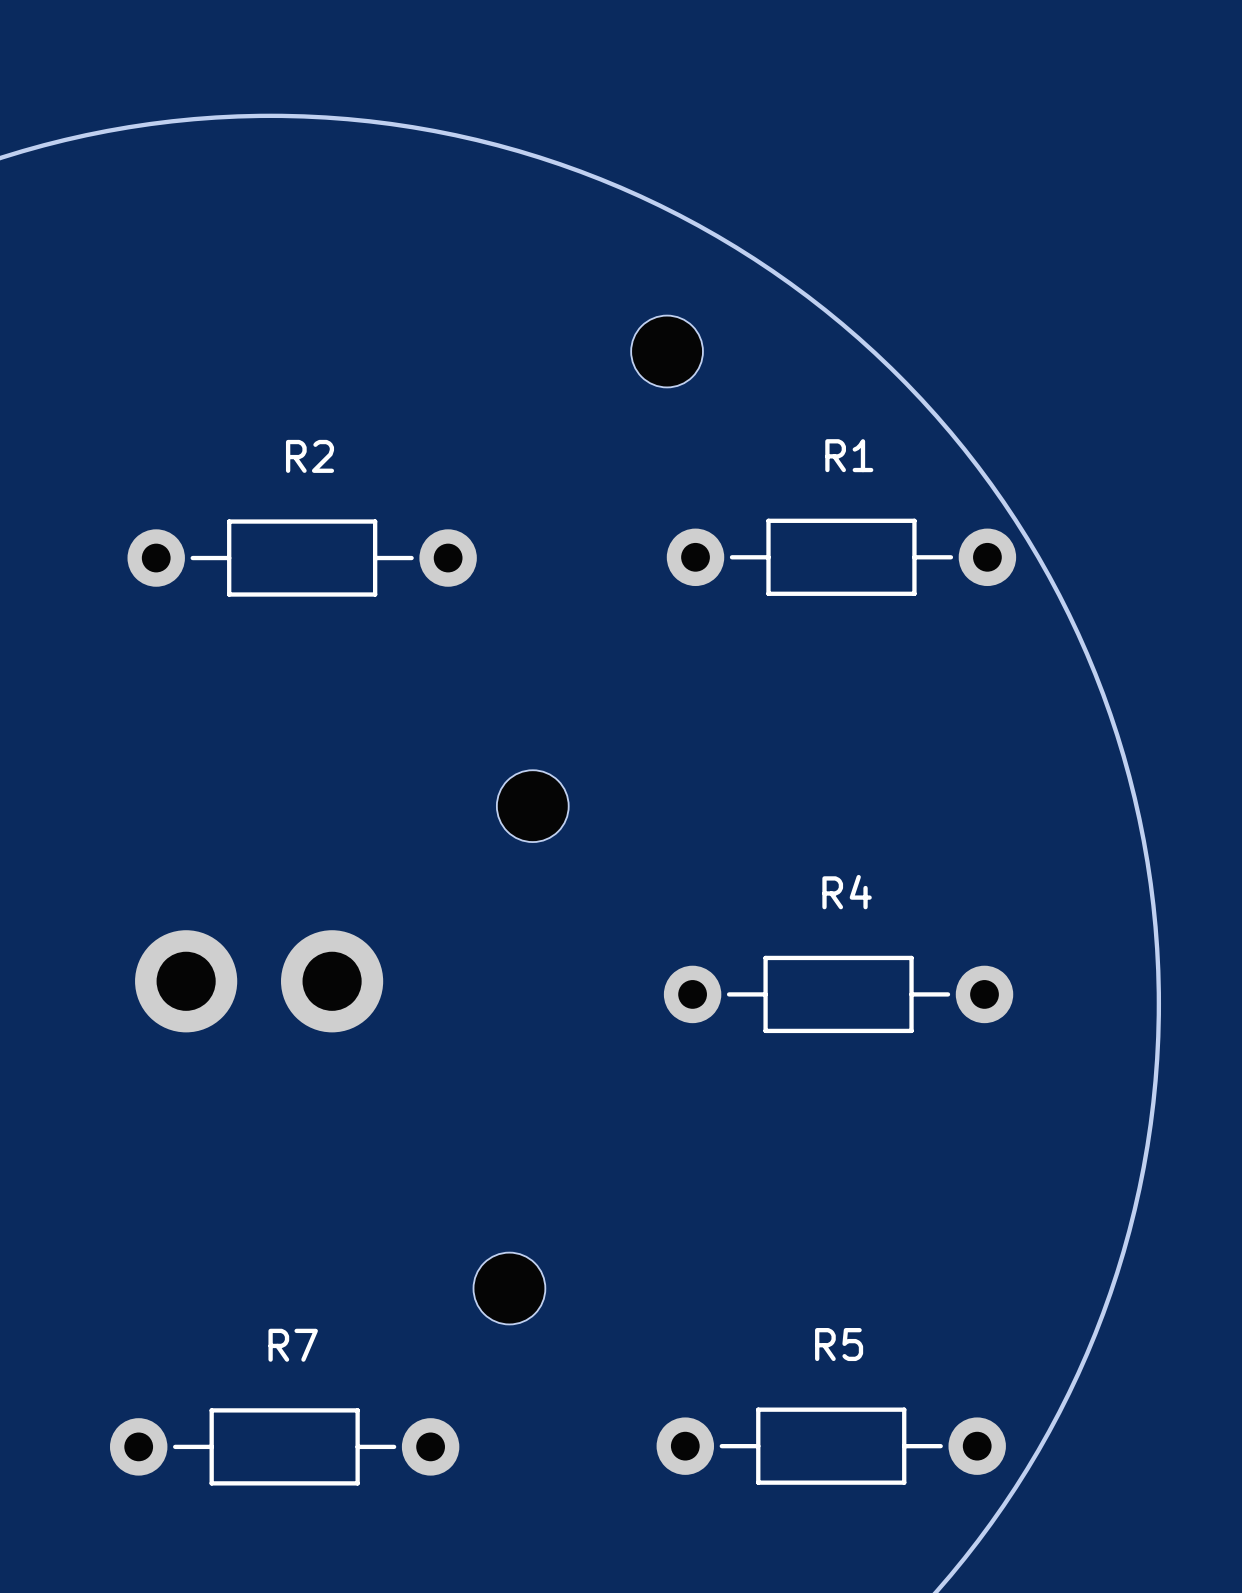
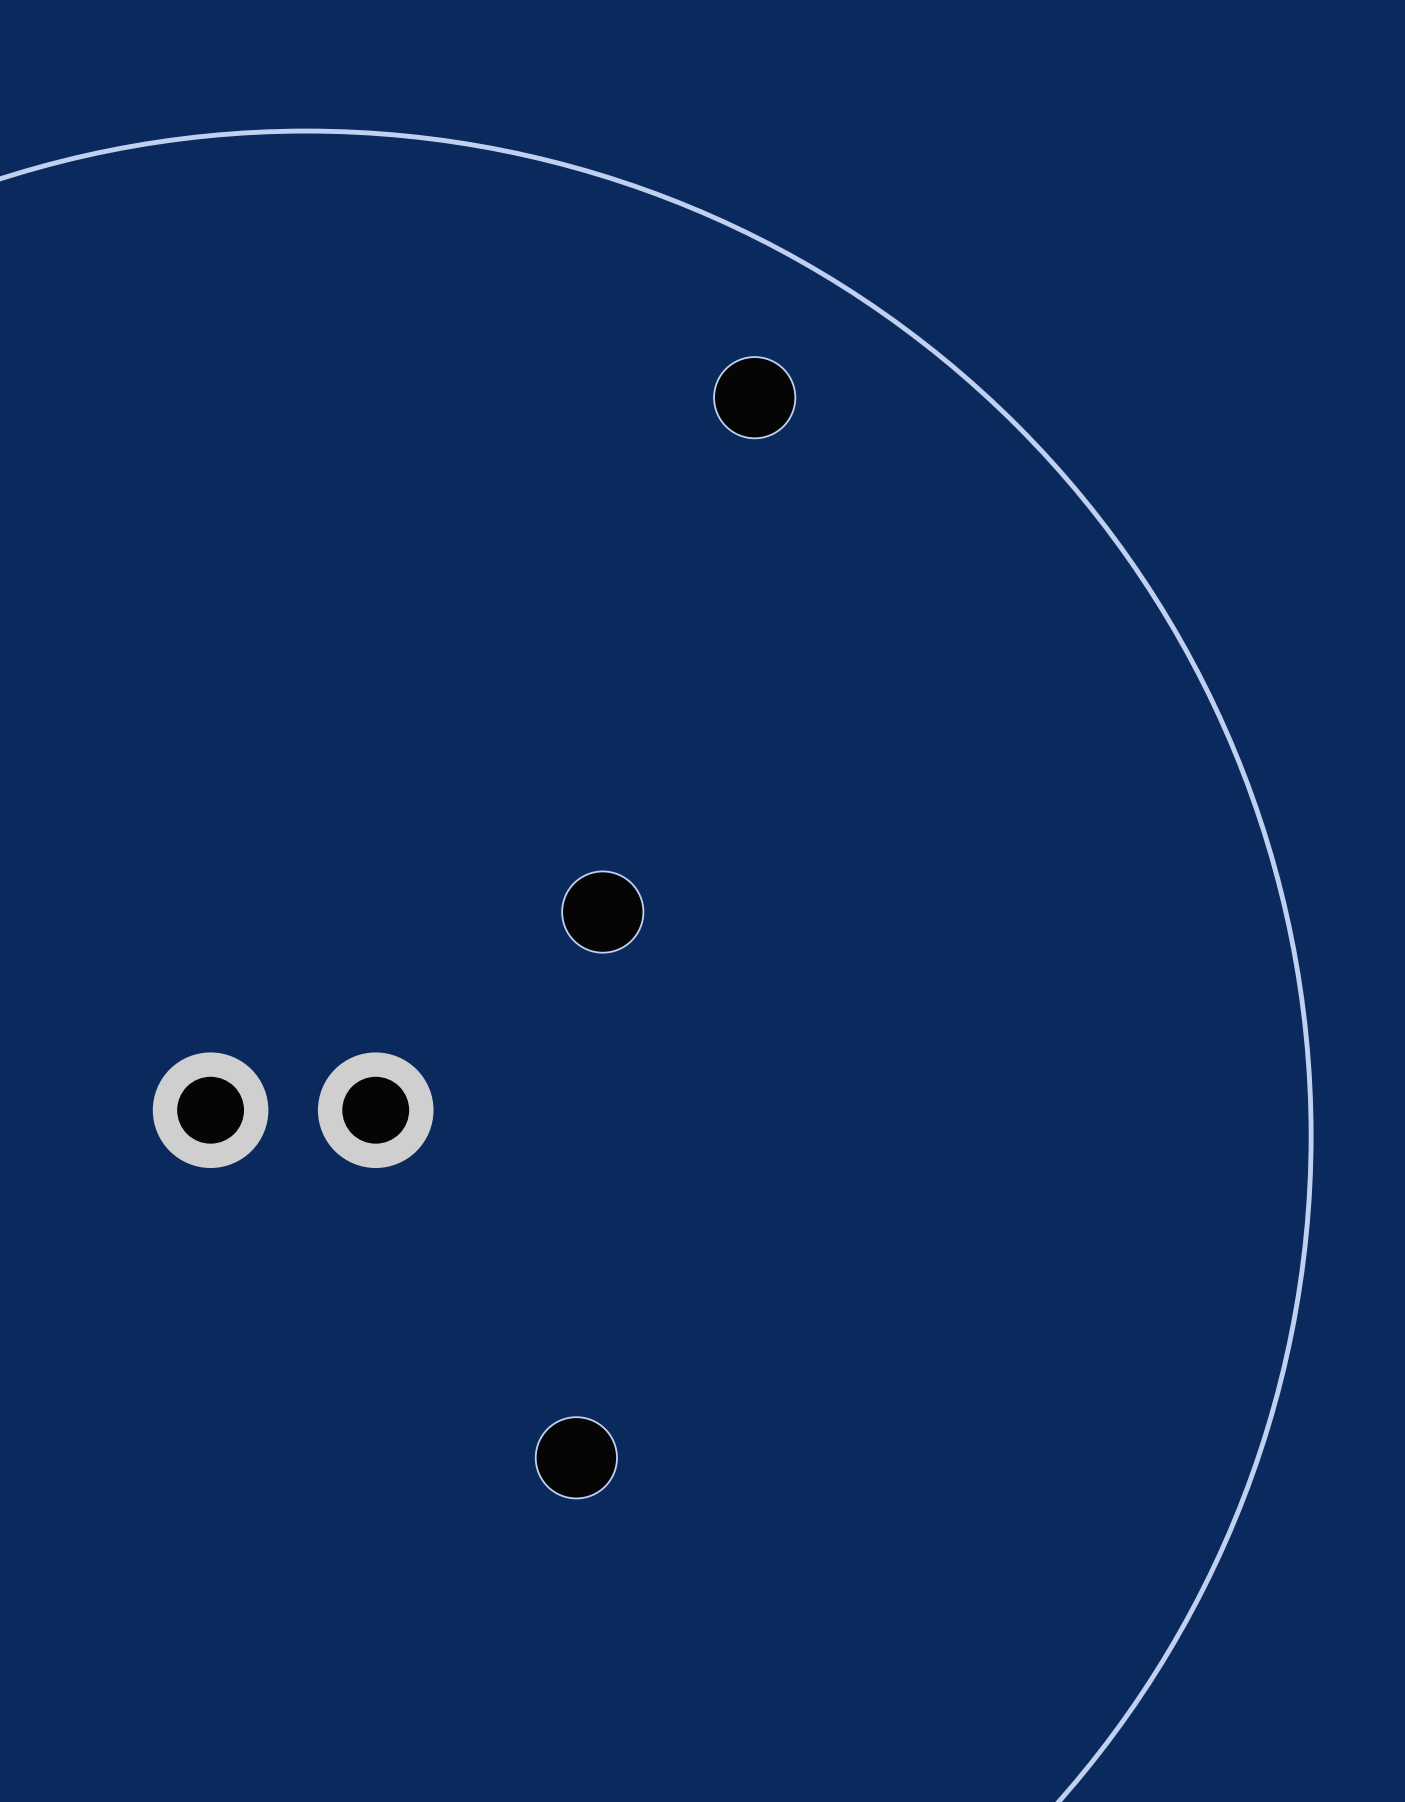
R1: (841, 557) -> none
R2: (302, 558) -> none
R4: (838, 994) -> none
R7: (284, 1446) -> none
R5: (831, 1446) -> none

